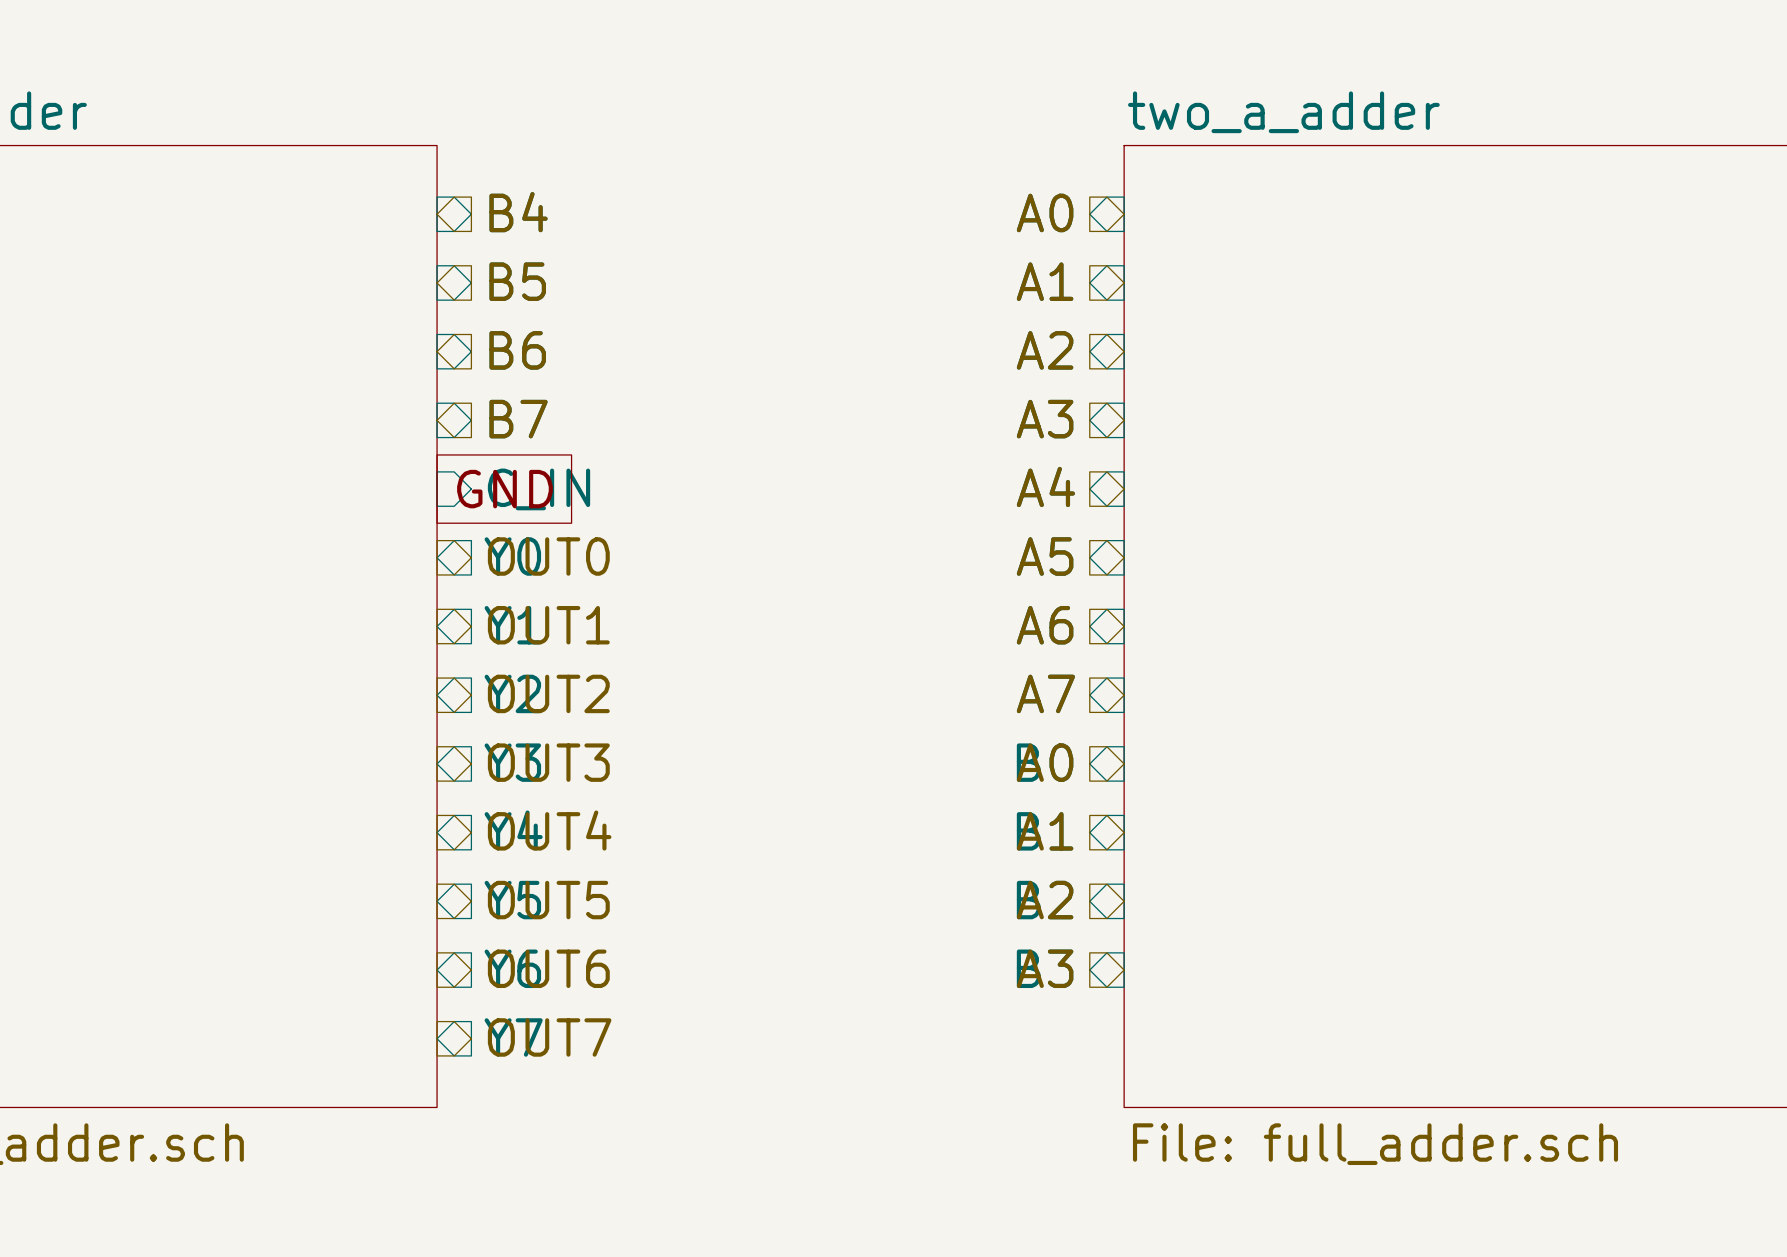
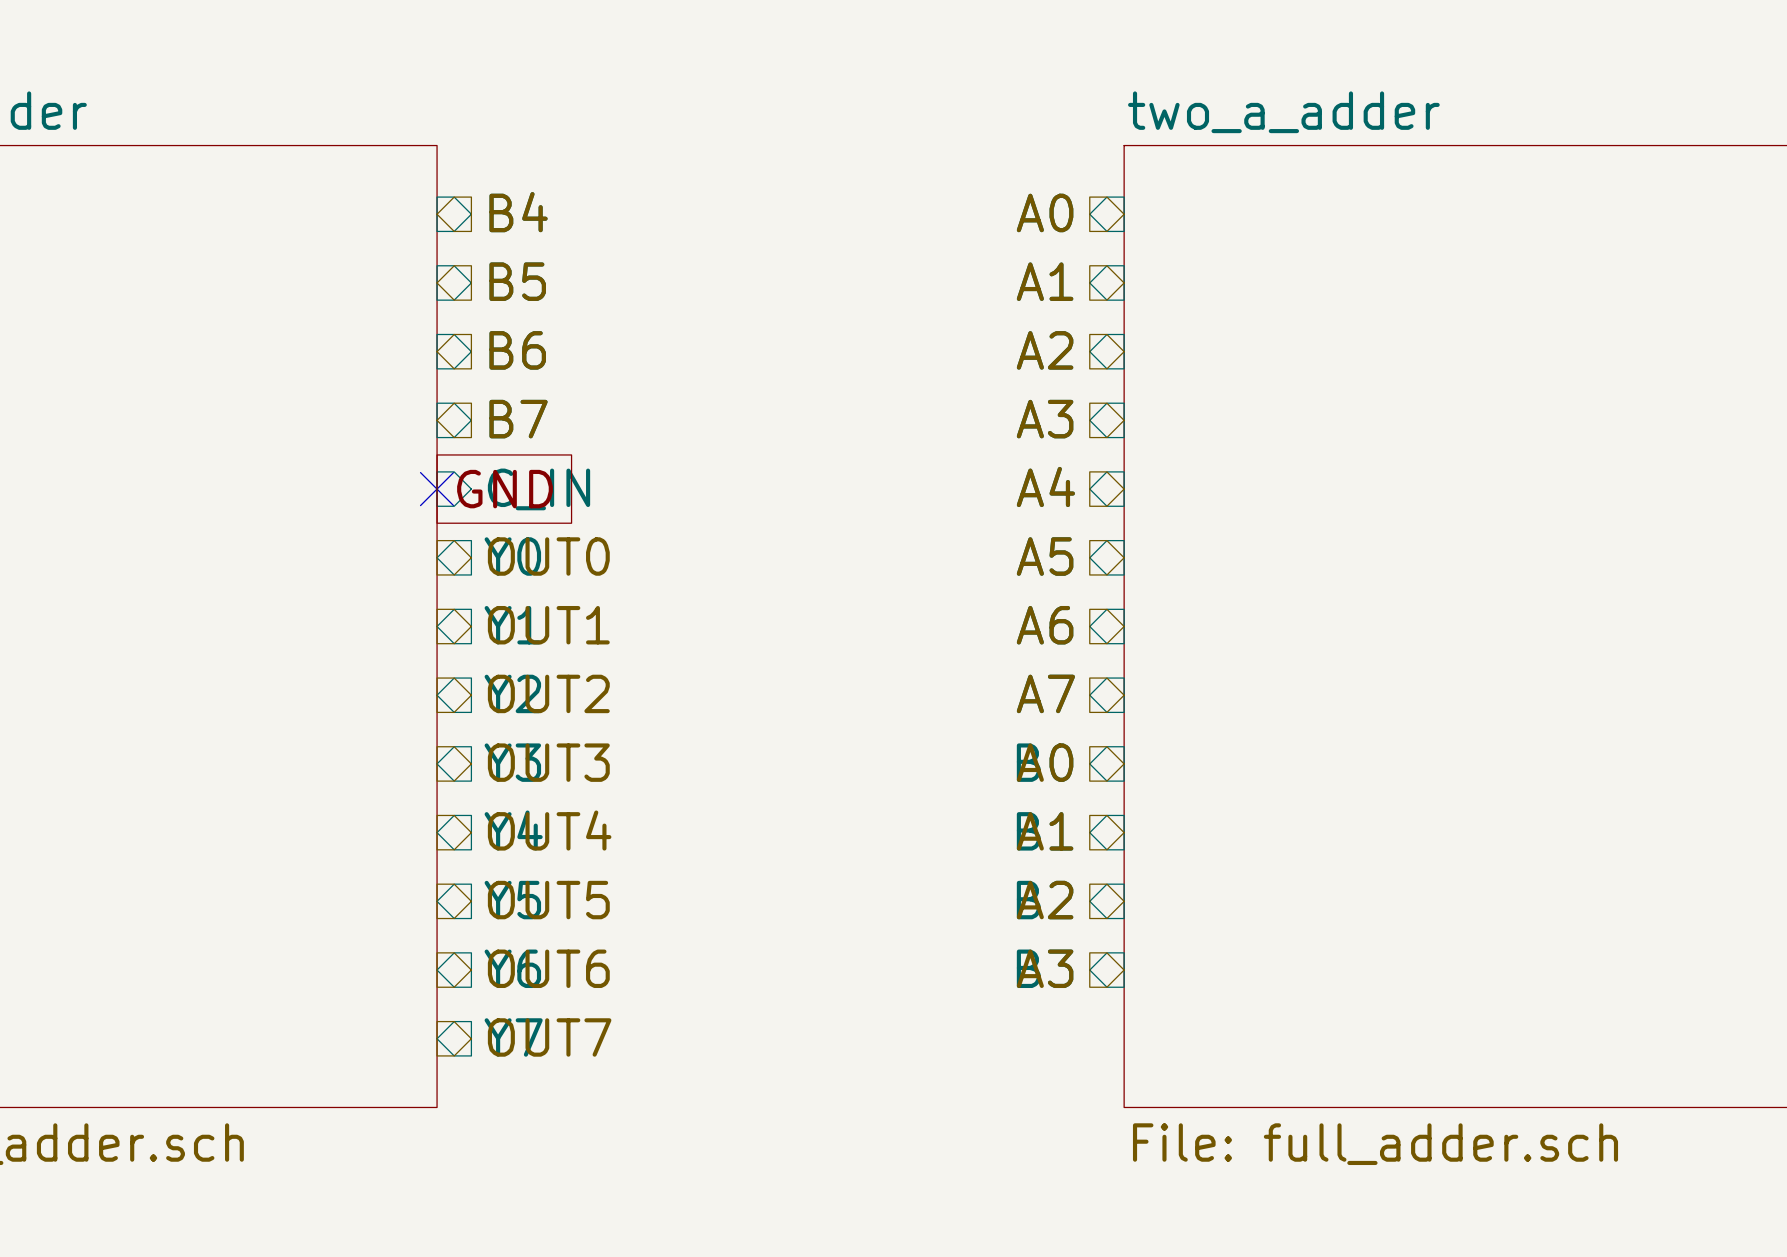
no-connect mark: none -> (437, 489)

